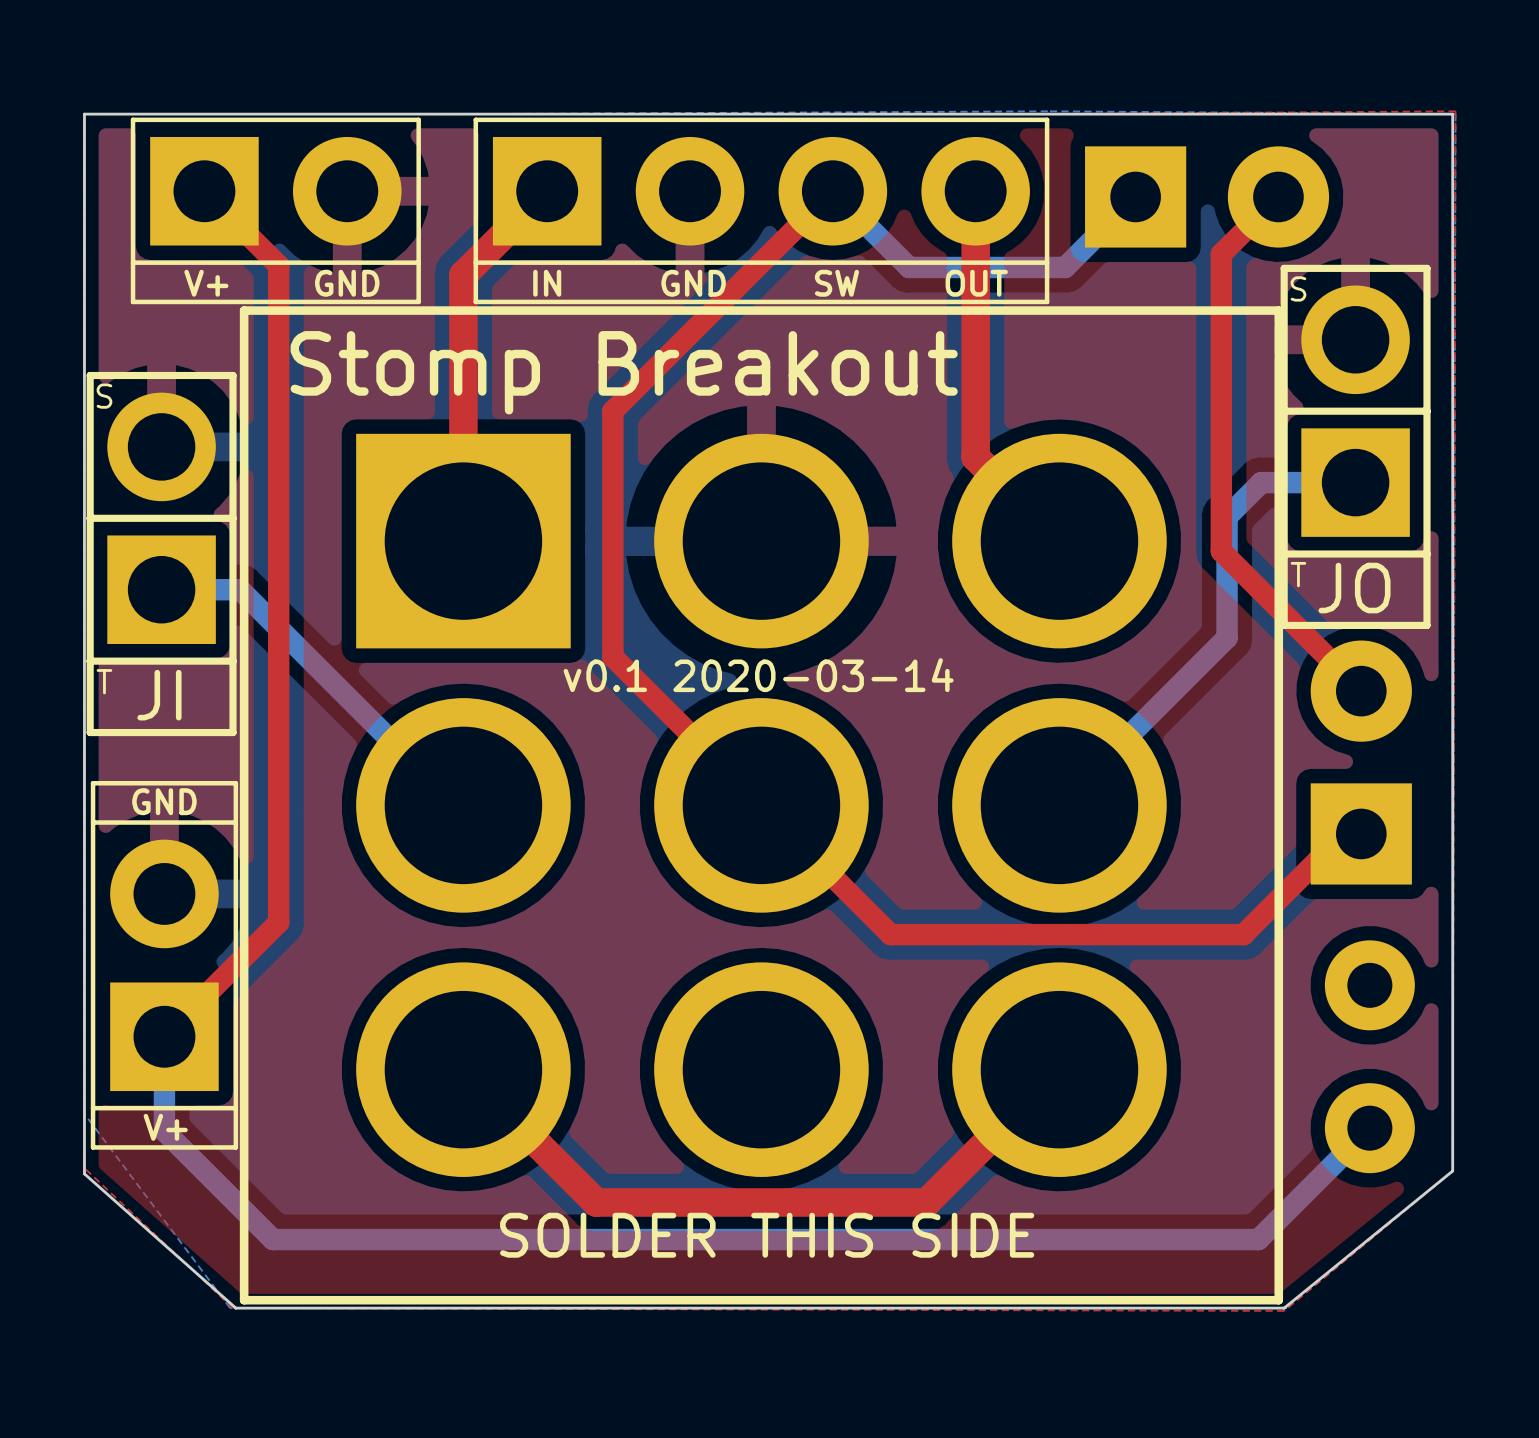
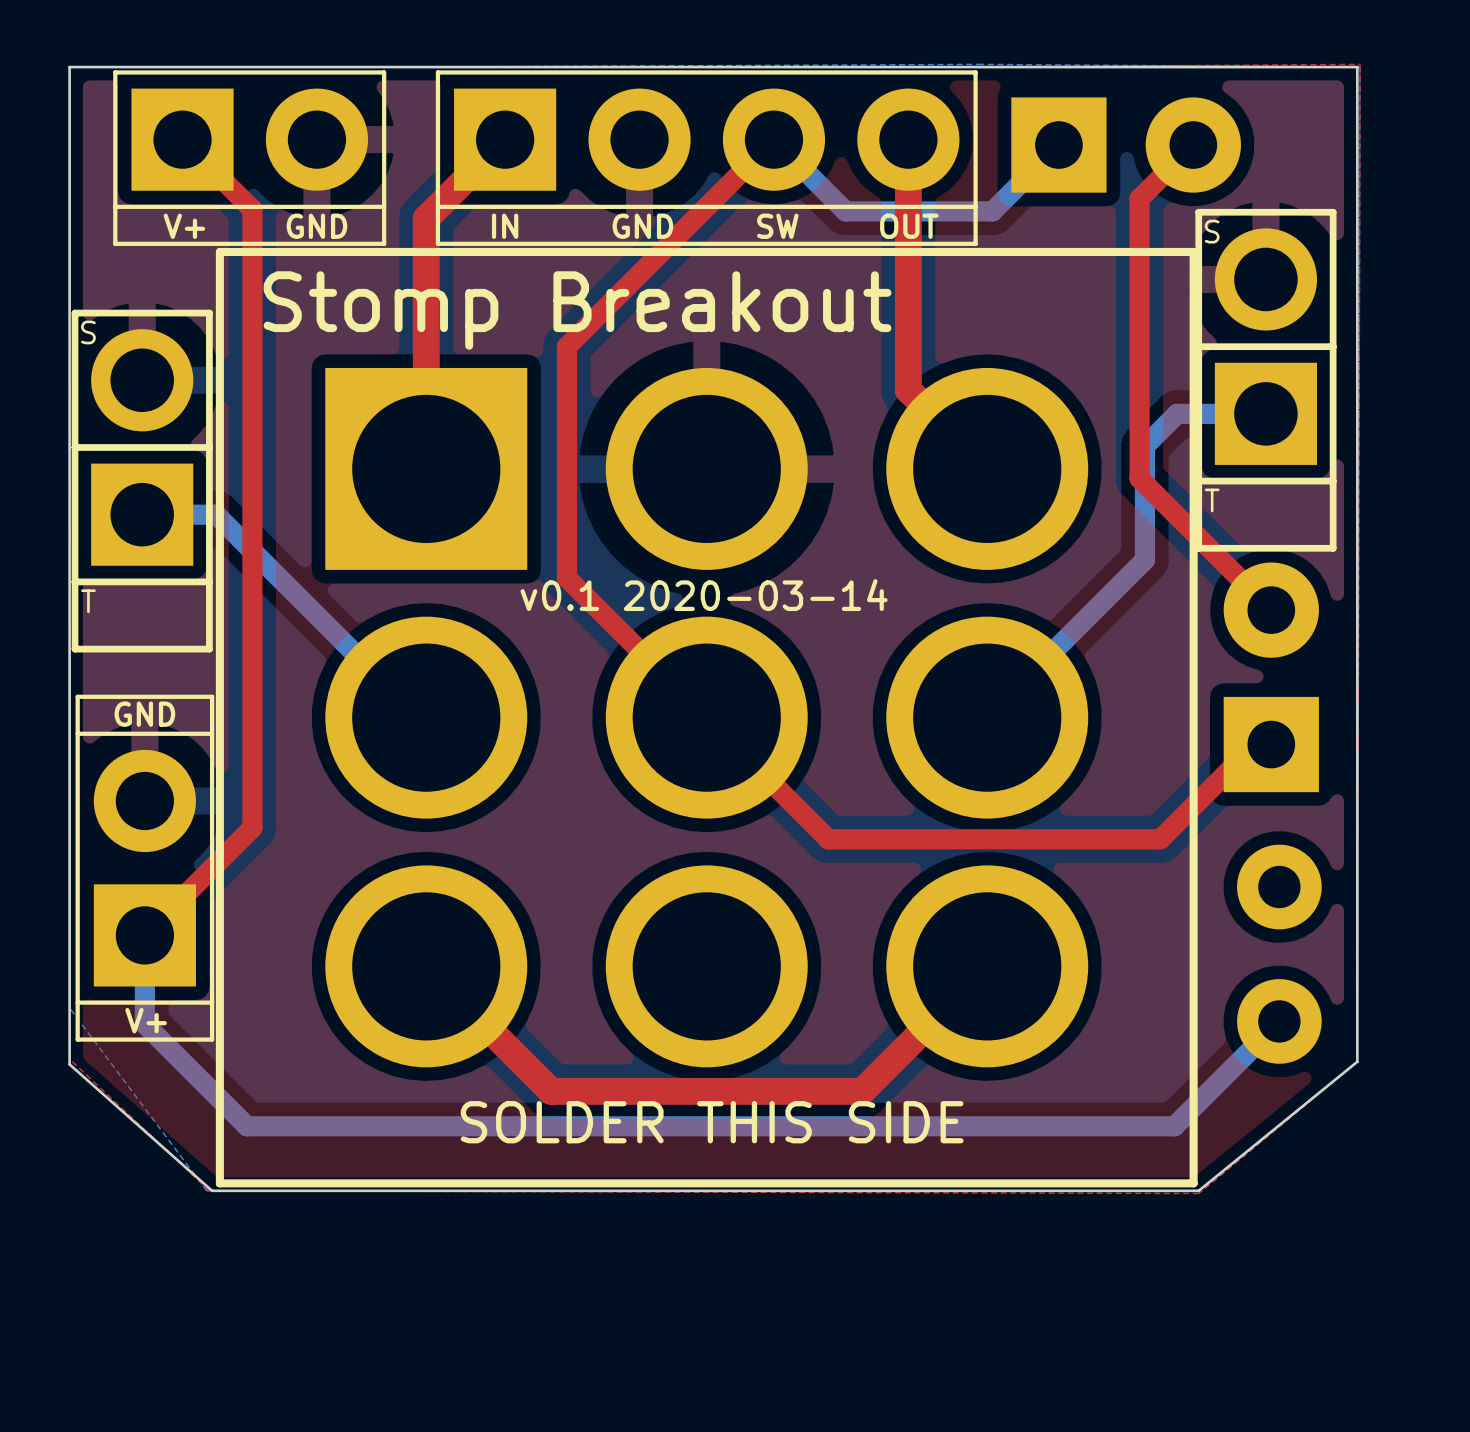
part value: JO (1354, 588) -> none
part value: JI (159, 695) -> none

